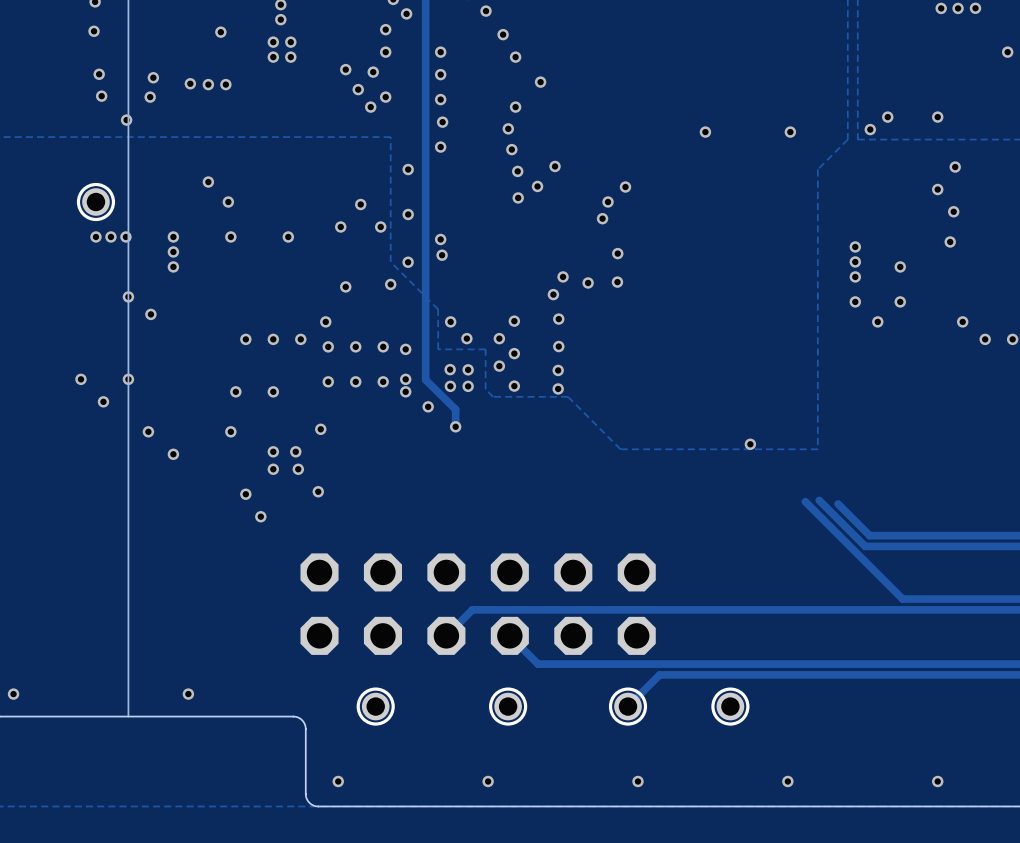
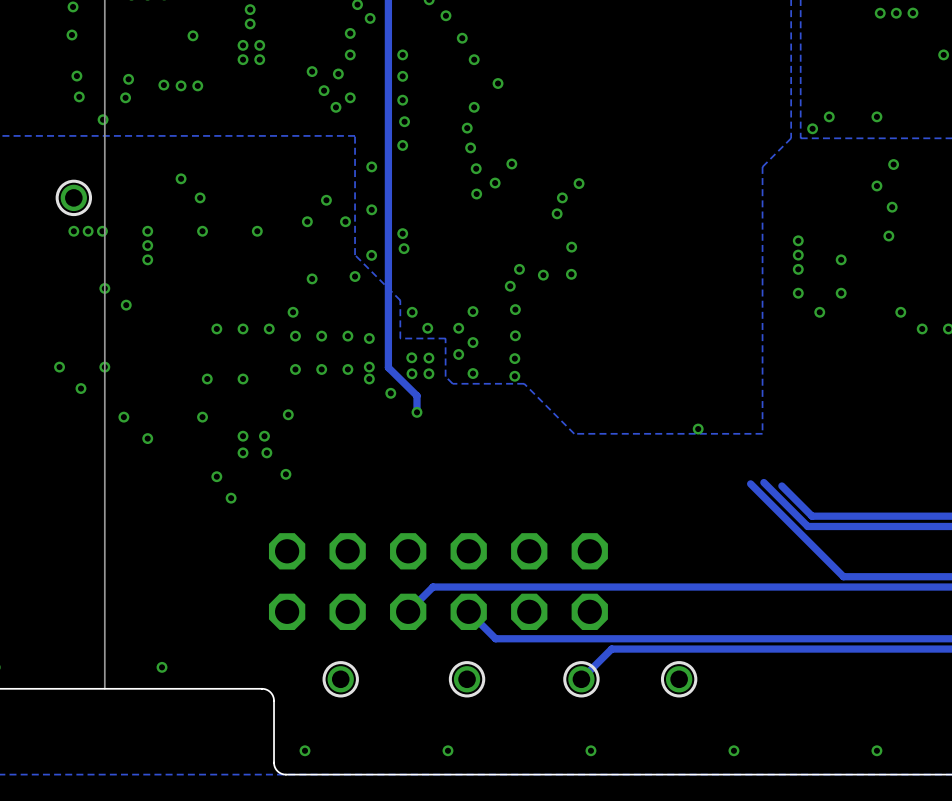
via: (705, 132) -> none
via: (790, 132) -> none

